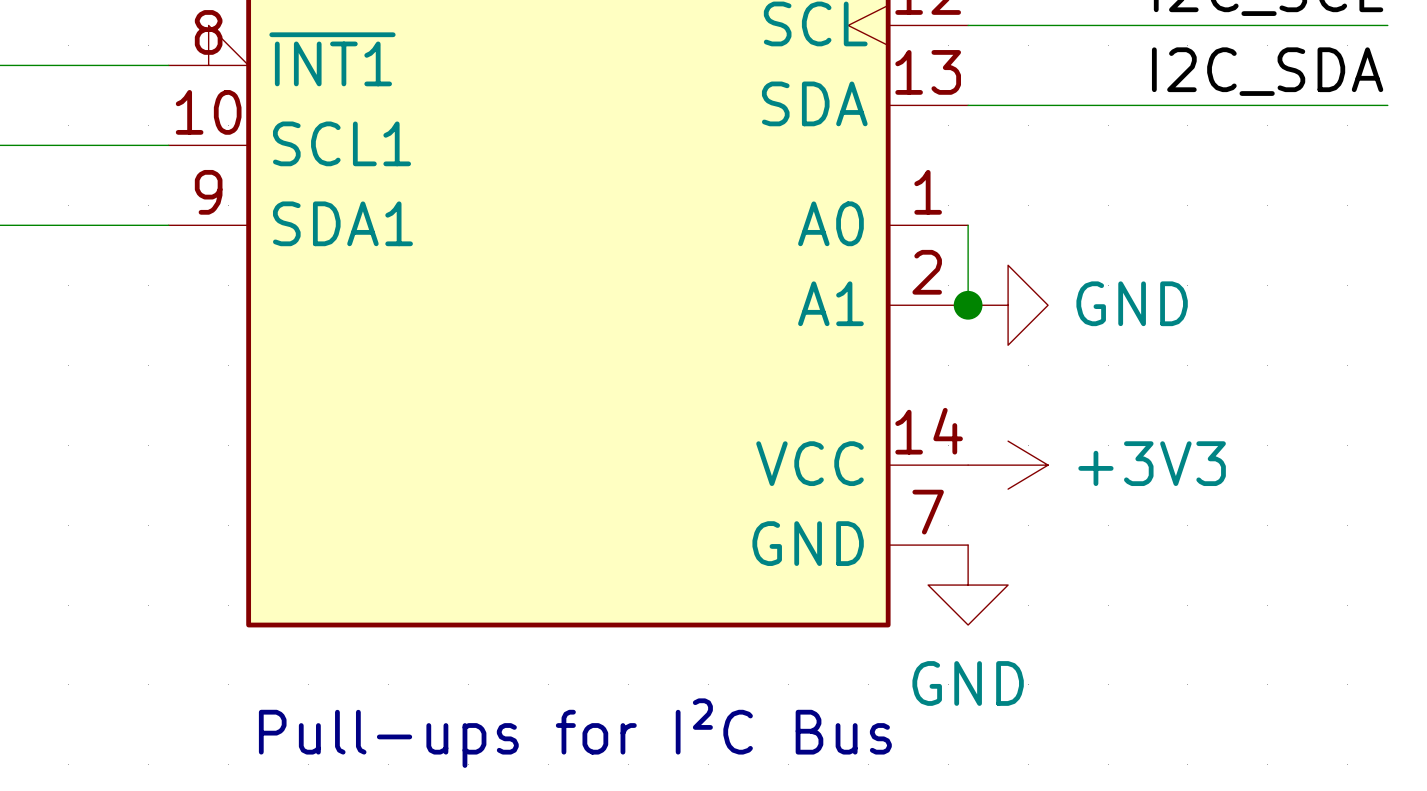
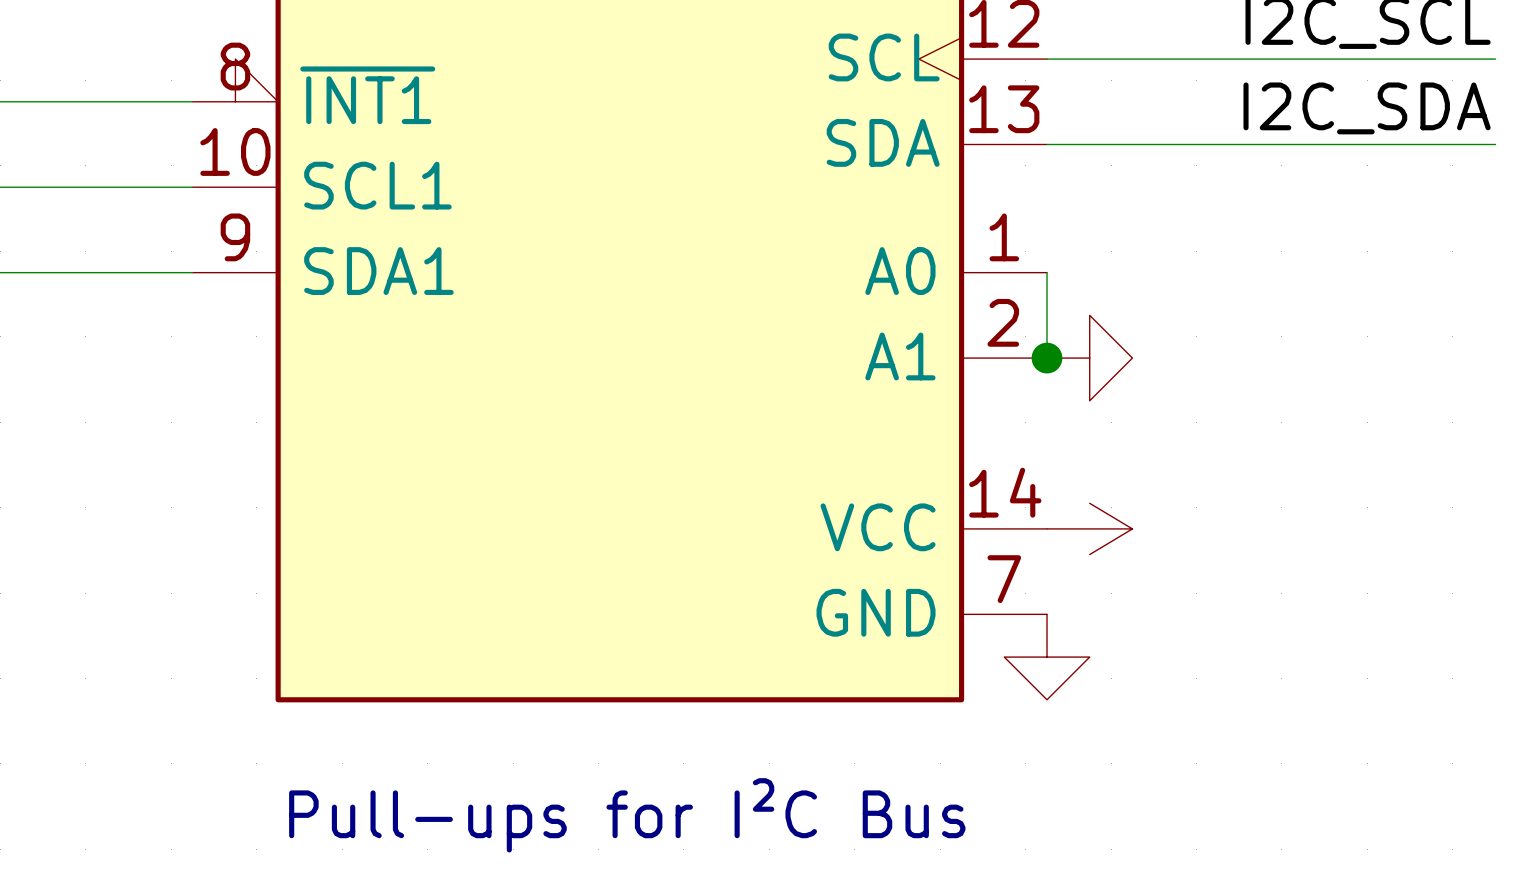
power symbol text: GND (1132, 303) -> none
power symbol text: +3V3 (1152, 463) -> none
power symbol text: GND (968, 683) -> none

